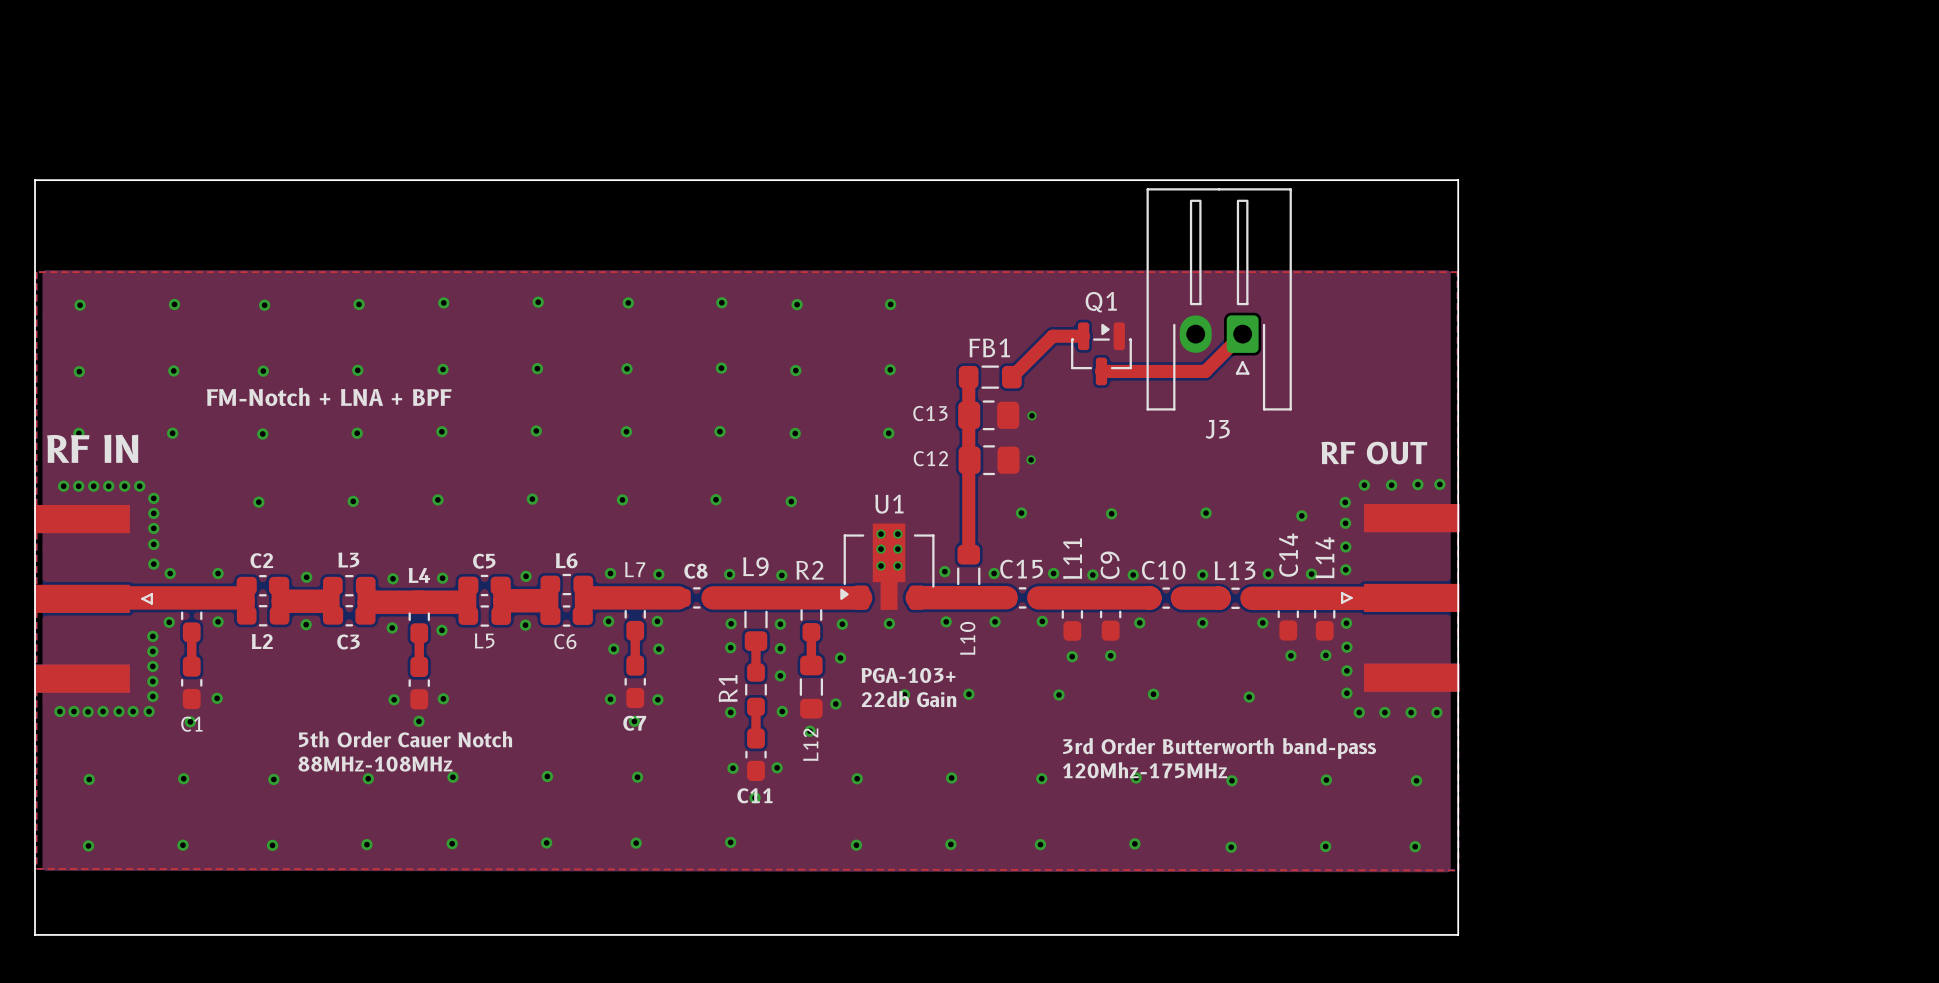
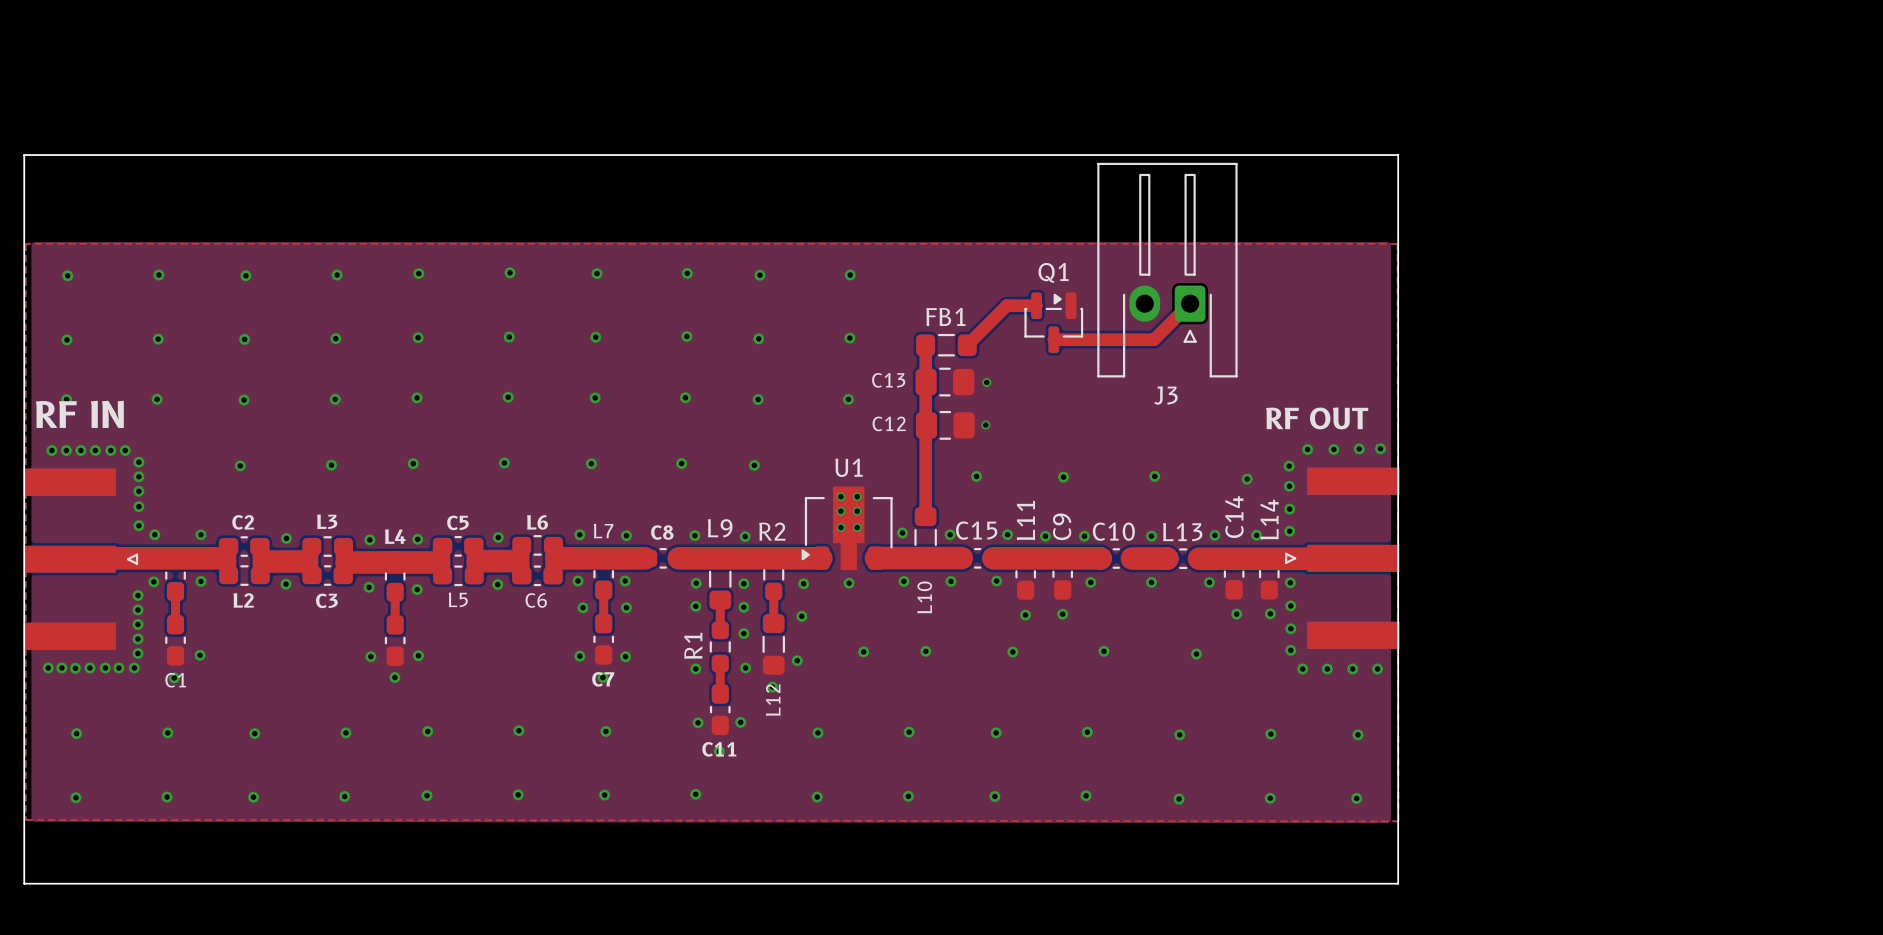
text: FM-Notch + LNA + BPF (329, 396) -> none
text: PGA-103+ (908, 675) -> none
text: 22db Gain (909, 699) -> none
text: 5th Order Cauer Notch (405, 739) -> none
text: 3rd Order Butterworth band-pass (1219, 748) -> none
text: 88MHz-108MHz (375, 764) -> none
text: 120Mhz-175MHz (1145, 770) -> none

